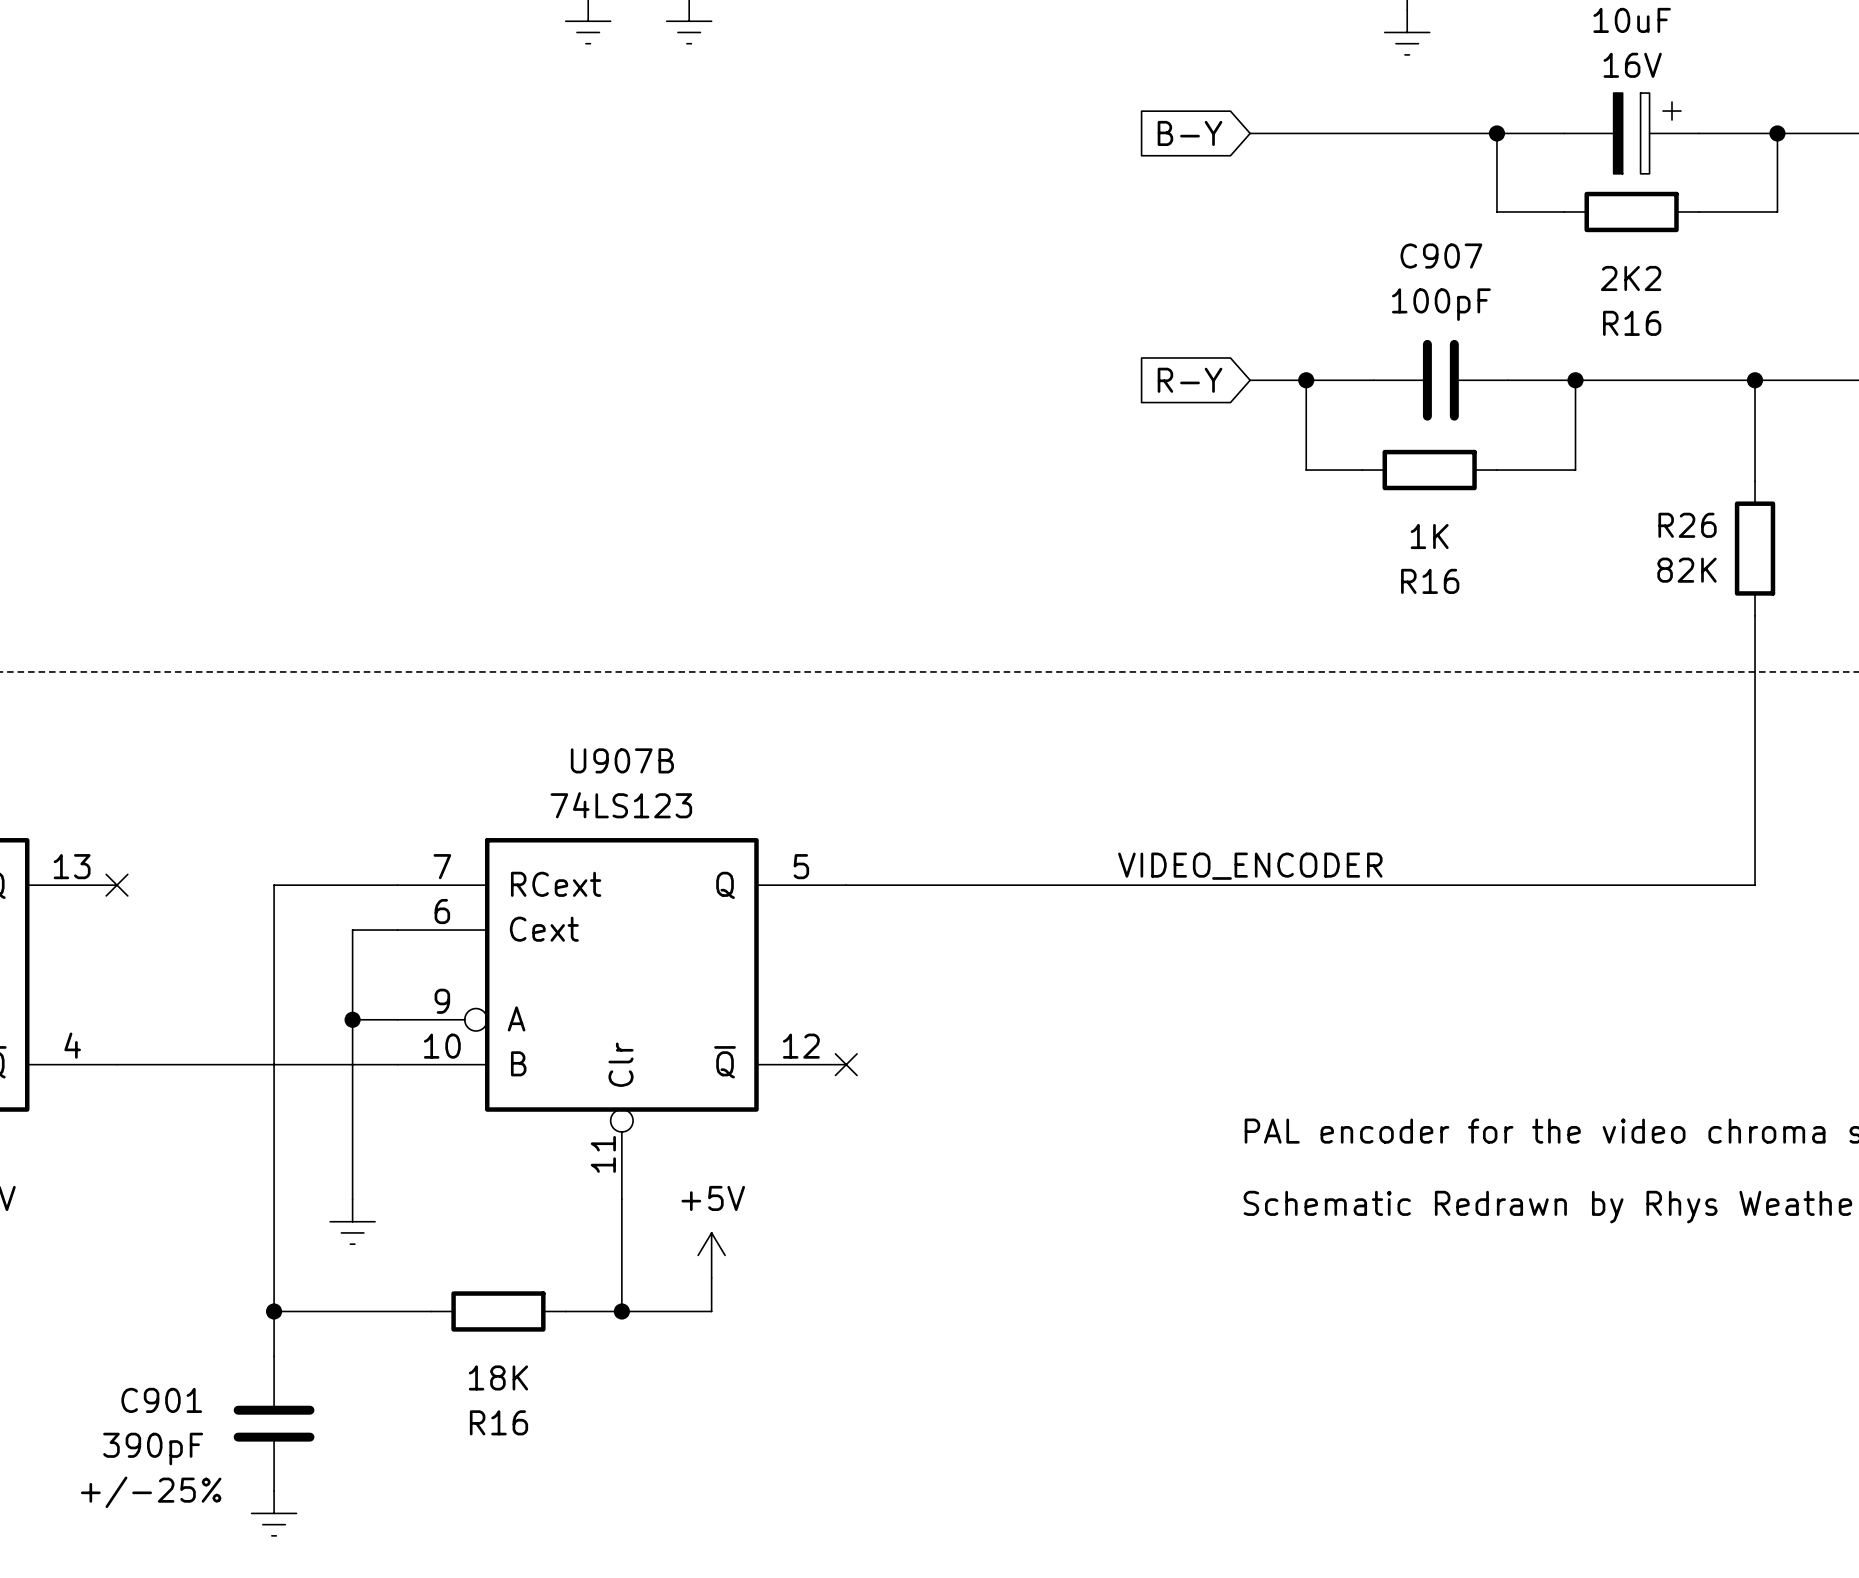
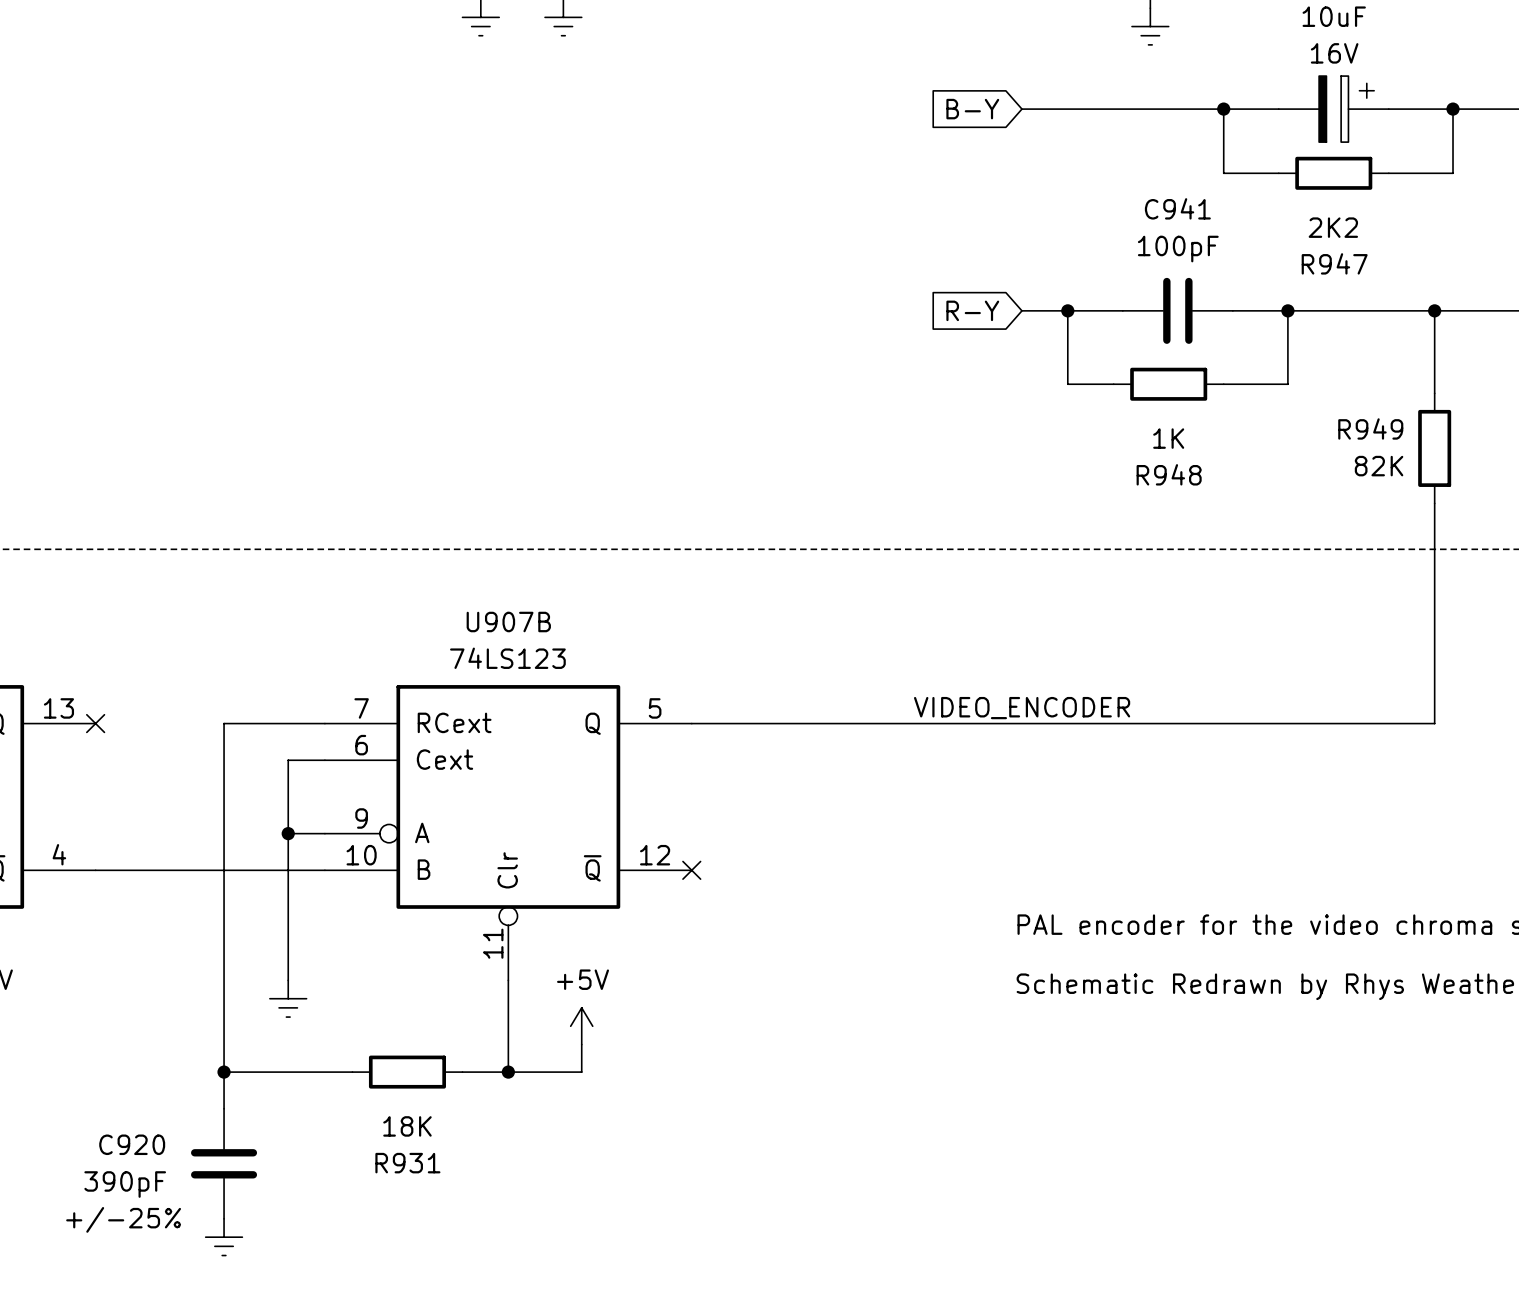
C907 name: C907 (1441, 256) -> C941 (1177, 208)
R16 name: R16 (1632, 323) -> R947 (1334, 263)
R26 name: R26 (1687, 525) -> R949 (1370, 428)
R16 name: R16 (1430, 581) -> R948 (1169, 474)
C901 name: C901 (161, 1400) -> C920 (132, 1144)
R16 name: R16 (498, 1422) -> R931 (407, 1163)

